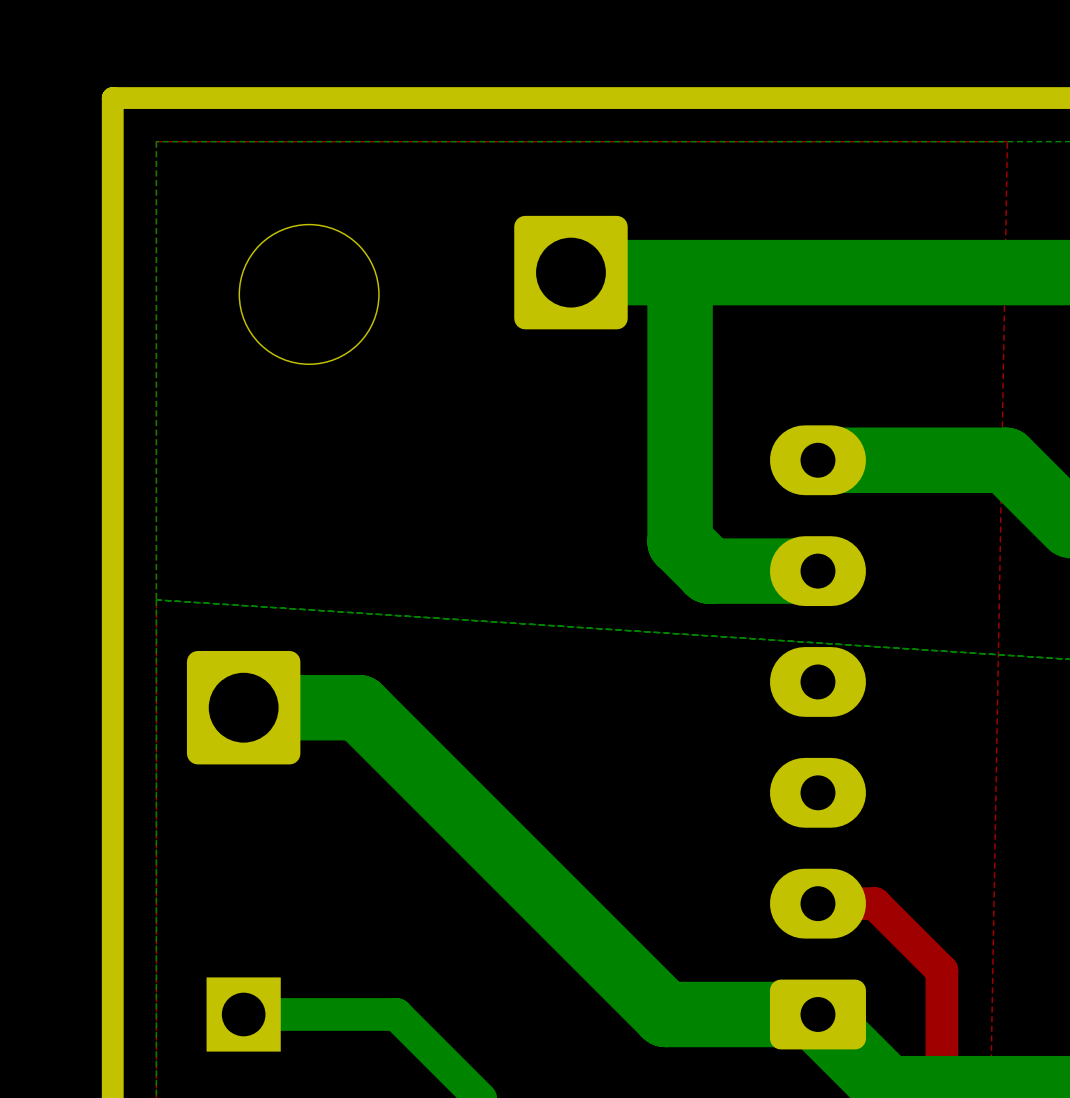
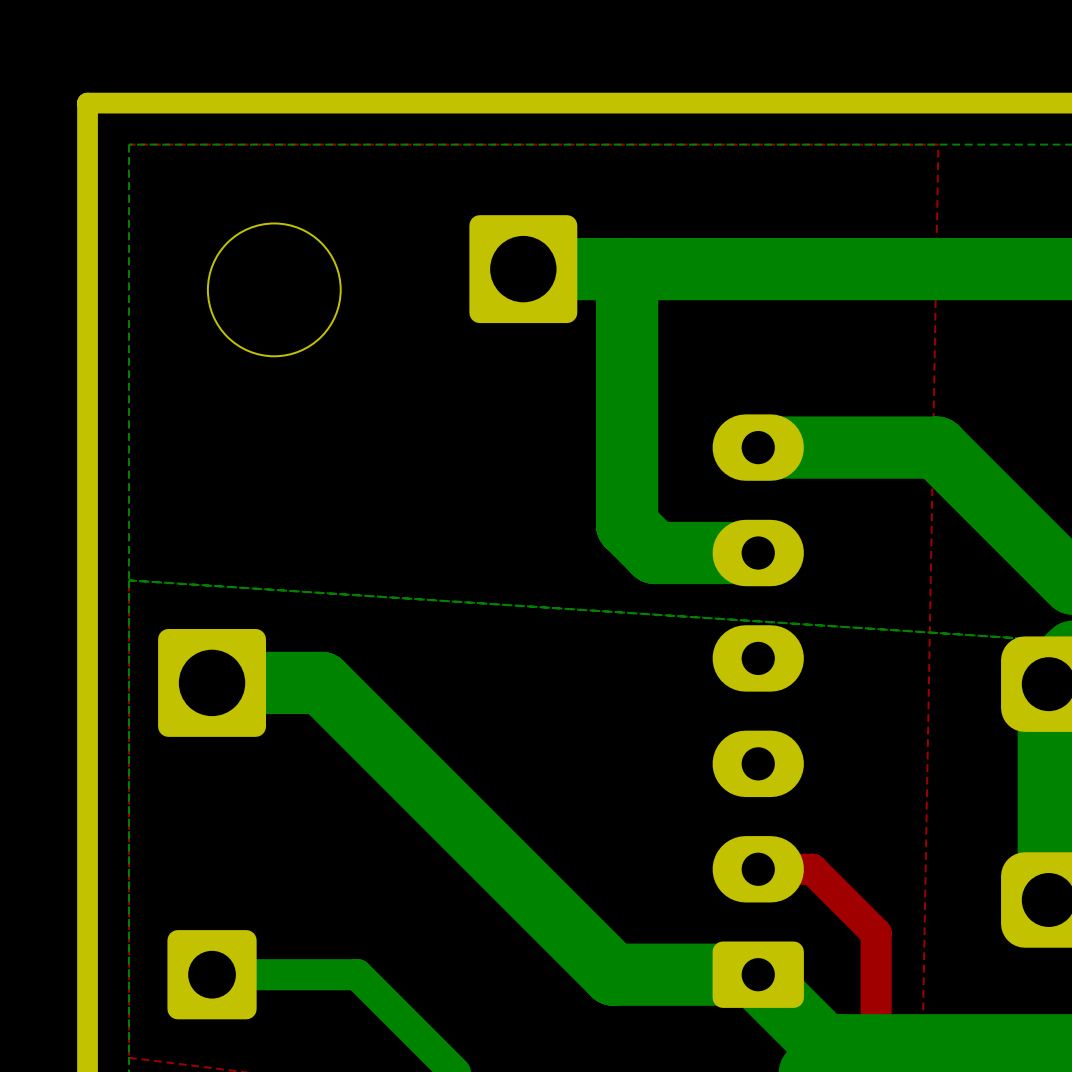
part footprint: [206, 977, 281, 1052] -> [167, 930, 257, 1020]

